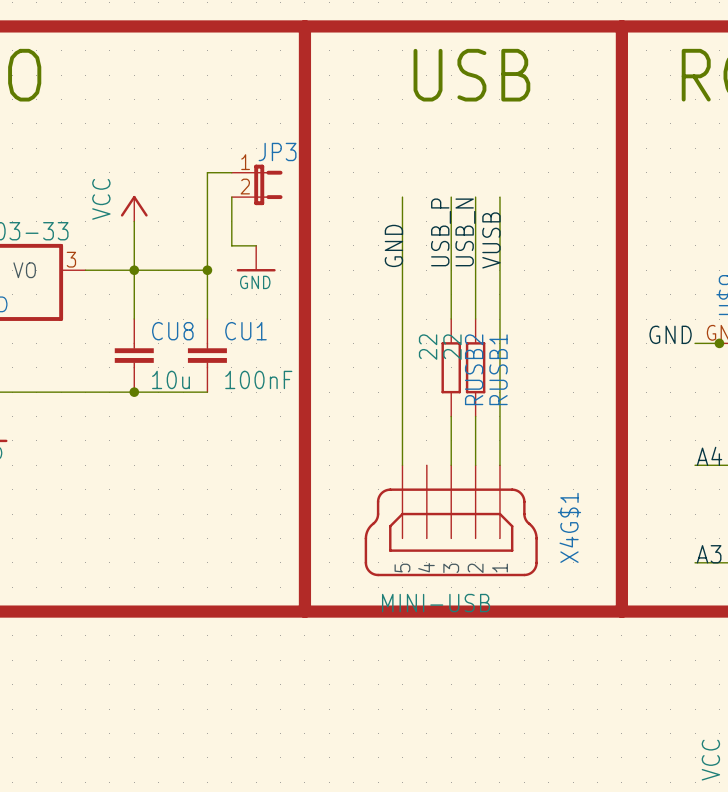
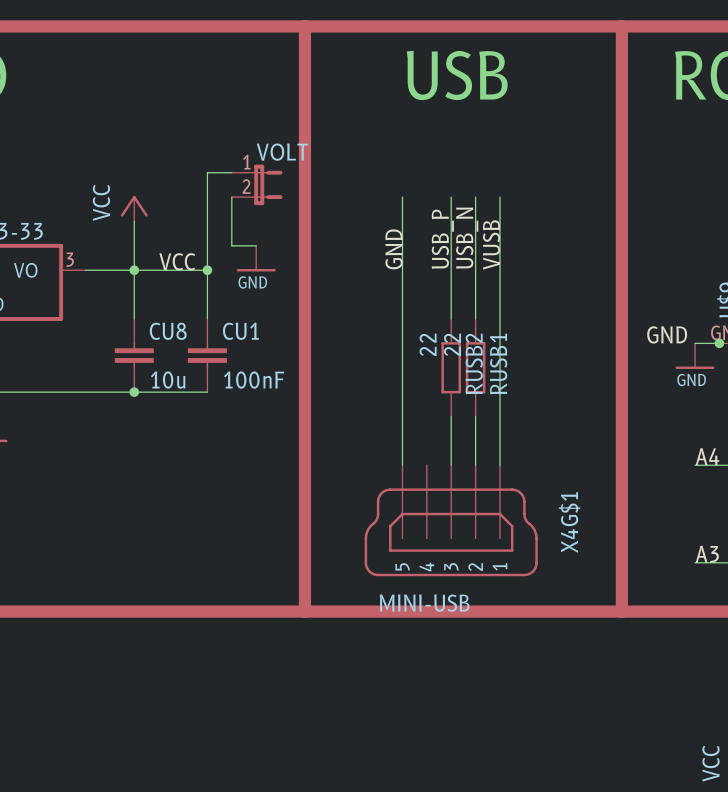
JP3 name: JP3 (277, 151) -> VOLT (282, 152)
label: none -> VCC (177, 261)
power symbol: none -> GND (695, 356)

